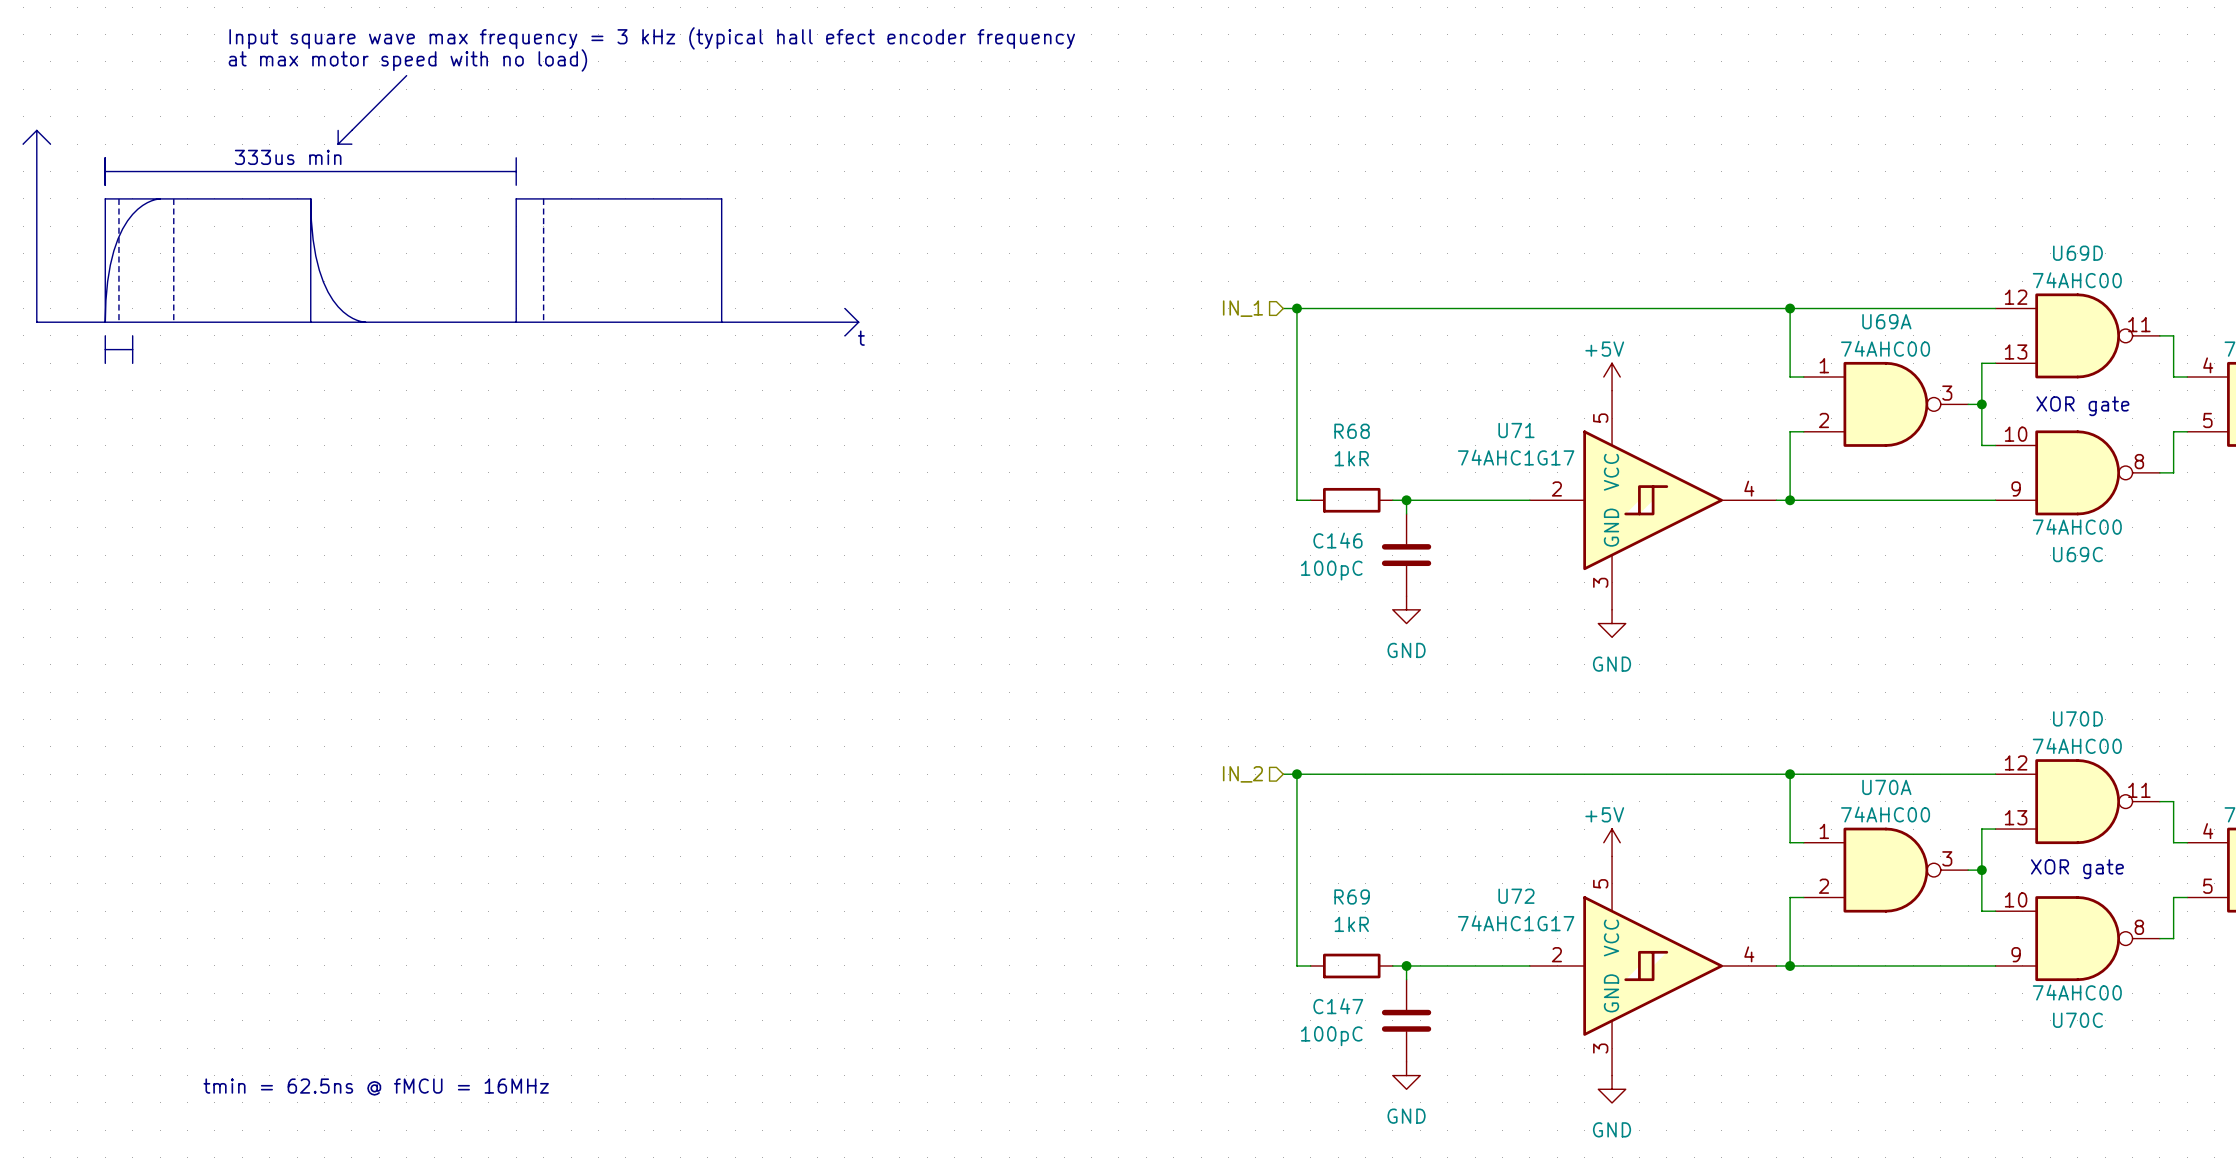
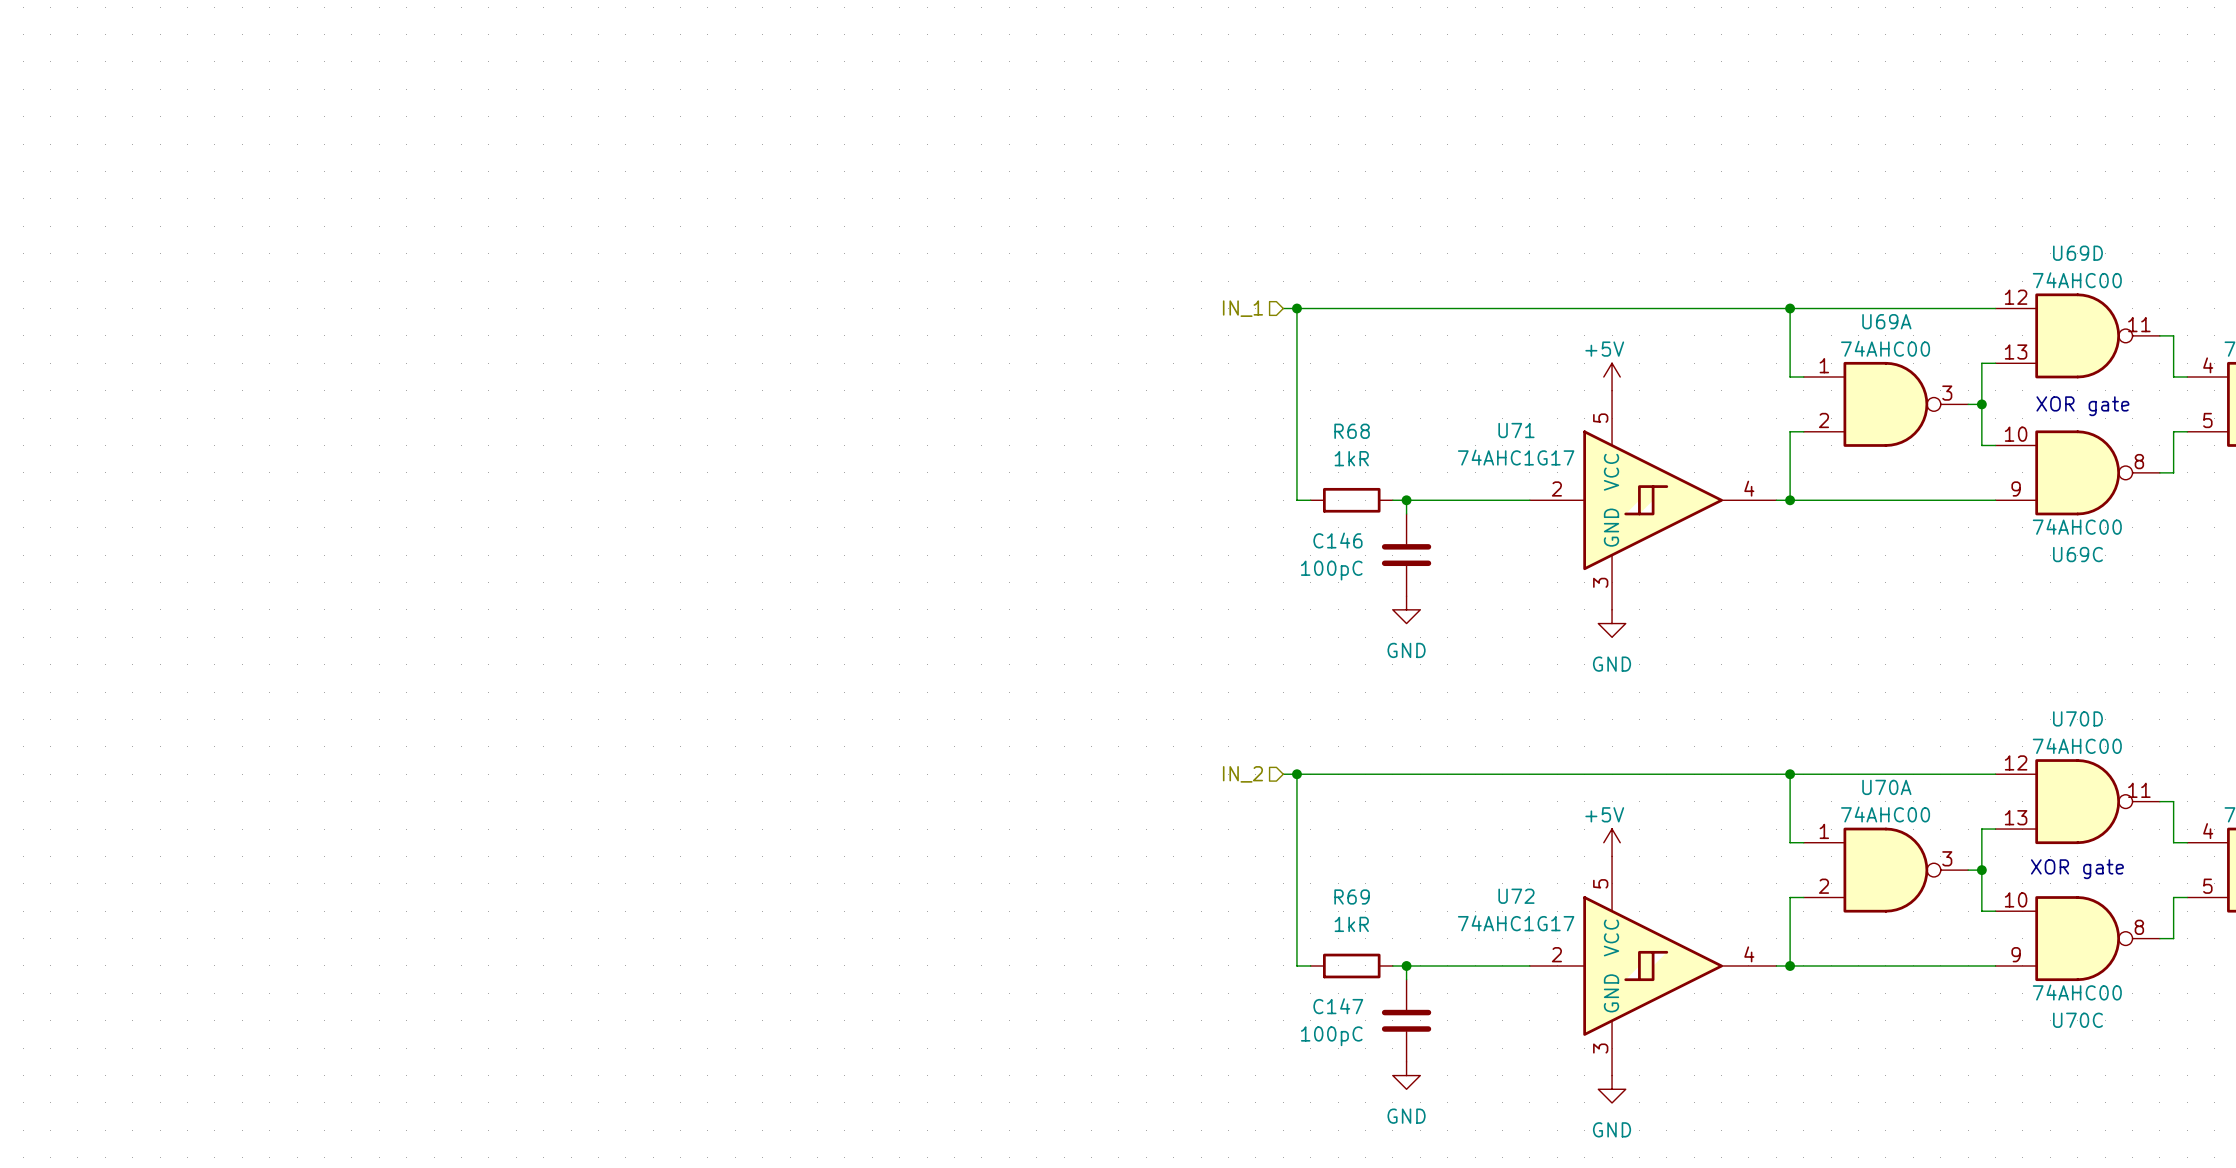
text: Input square wave max frequency = 3 kHz (typical hall efect encoder frequency (652, 38) -> none
text: at max motor speed with no load) (407, 60) -> none
line: (406, 75) (338, 144) -> none
line: (36, 130) (23, 144) -> none
line: (36, 130) (50, 144) -> none
line: (36, 130) (36, 322) (858, 322) -> none
line: (338, 130) (338, 144) -> none
line: (338, 144) (351, 144) -> none
line: (105, 157) (105, 185) -> none
text: 333us min (288, 157) -> none
line: (516, 157) (516, 185) -> none
line: (105, 171) (516, 171) -> none
line: (118, 198) (118, 322) -> none
line: (160, 198) (159, 198) (157, 199) (155, 199) (147, 202) (137, 209) (127, 220) (117, 238) (107, 281) (105, 322) (105, 198) (310, 198) -> none
line: (173, 198) (173, 322) -> none
line: (310, 198) (310, 322) -> none
line: (310, 198) (313, 239) (323, 282) (333, 300) (343, 311) (352, 318) (365, 322) -> none
line: (543, 198) (543, 322) -> none
line: (844, 308) (858, 322) -> none
line: (516, 322) (516, 198) (721, 198) (721, 322) -> none
line: (858, 322) (844, 335) -> none
line: (105, 335) (105, 363) -> none
line: (132, 335) (132, 363) -> none
text: t (861, 338) -> none
line: (105, 349) (132, 349) -> none
text: tmin = 62.5ns @ fMCU = 16MHz (376, 1087) -> none

